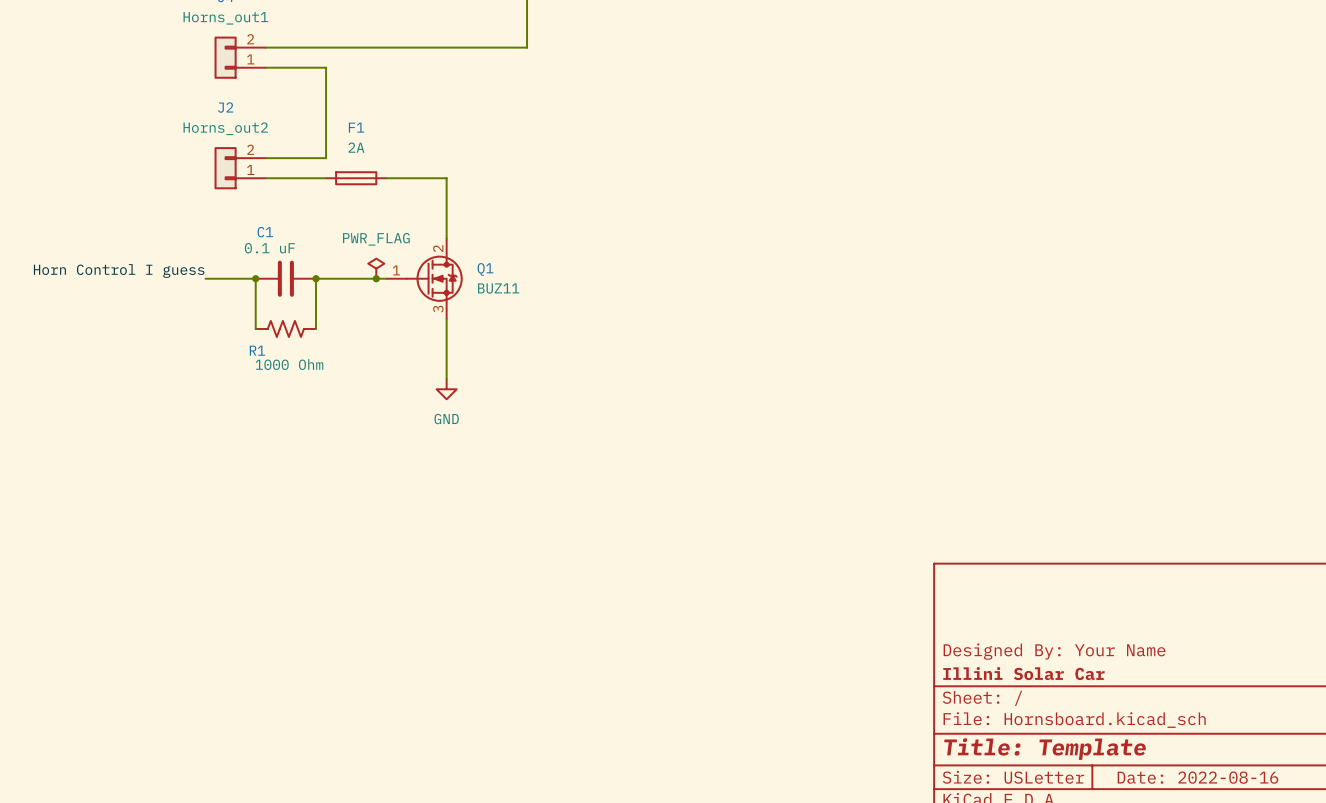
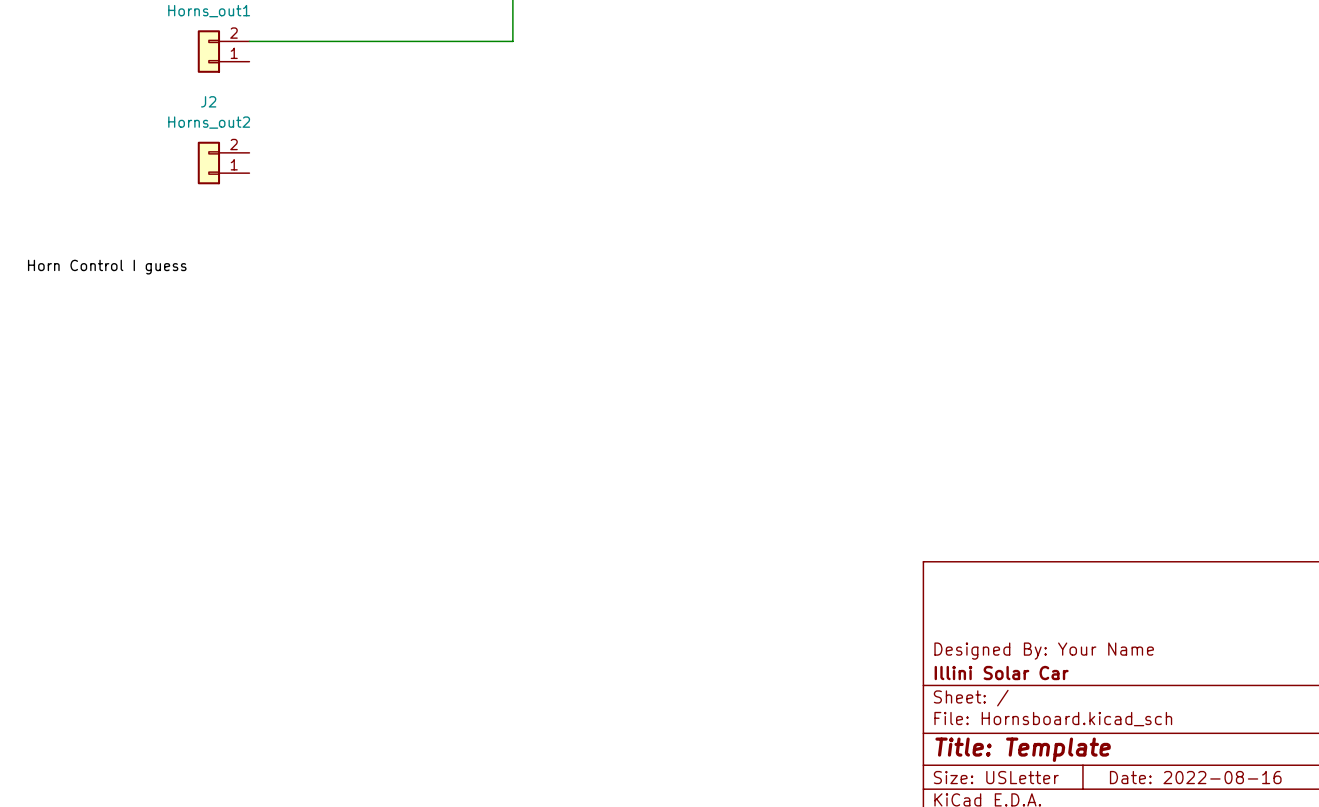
wire: (265, 67) (326, 67) (326, 158) (265, 158) -> none
wire: (265, 178) (326, 178) -> none
F1: 2A (356, 178) -> none
wire: (386, 178) (446, 178) (446, 238) -> none
power symbol: PWR_FLAG (376, 268) -> none
wire: (205, 278) (255, 278) (255, 328) -> none
junction: (255, 278) -> none
C1: 0.1 uF (285, 278) -> none
junction: (316, 278) -> none
junction: (376, 278) -> none
wire: (386, 278) (316, 278) (316, 328) -> none
Q1: BUZ11 (424, 278) -> none
wire: (446, 318) (446, 379) -> none
R1: 1000 Ohm (285, 328) -> none
power symbol: GND (446, 389) -> none

